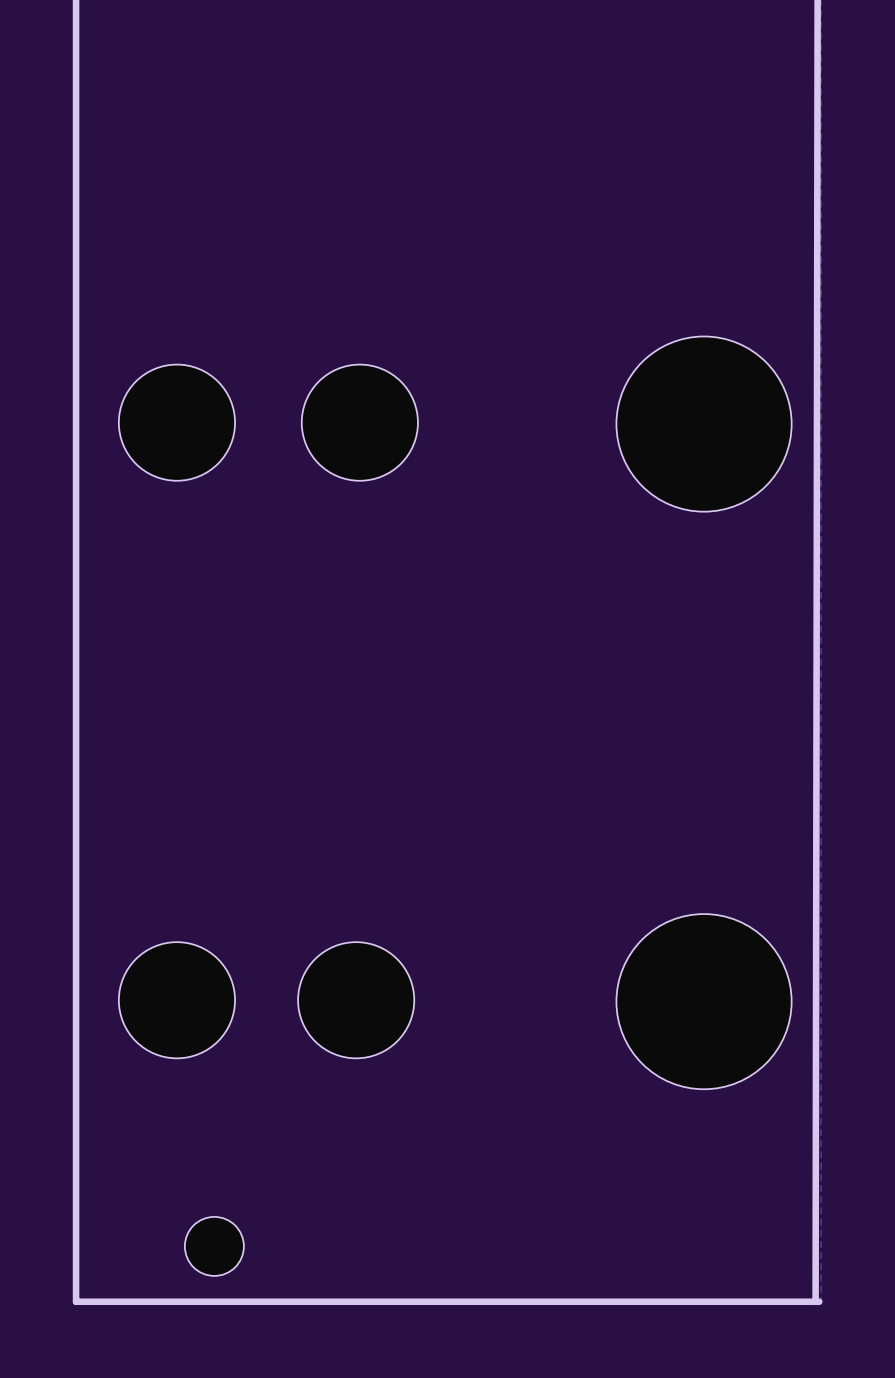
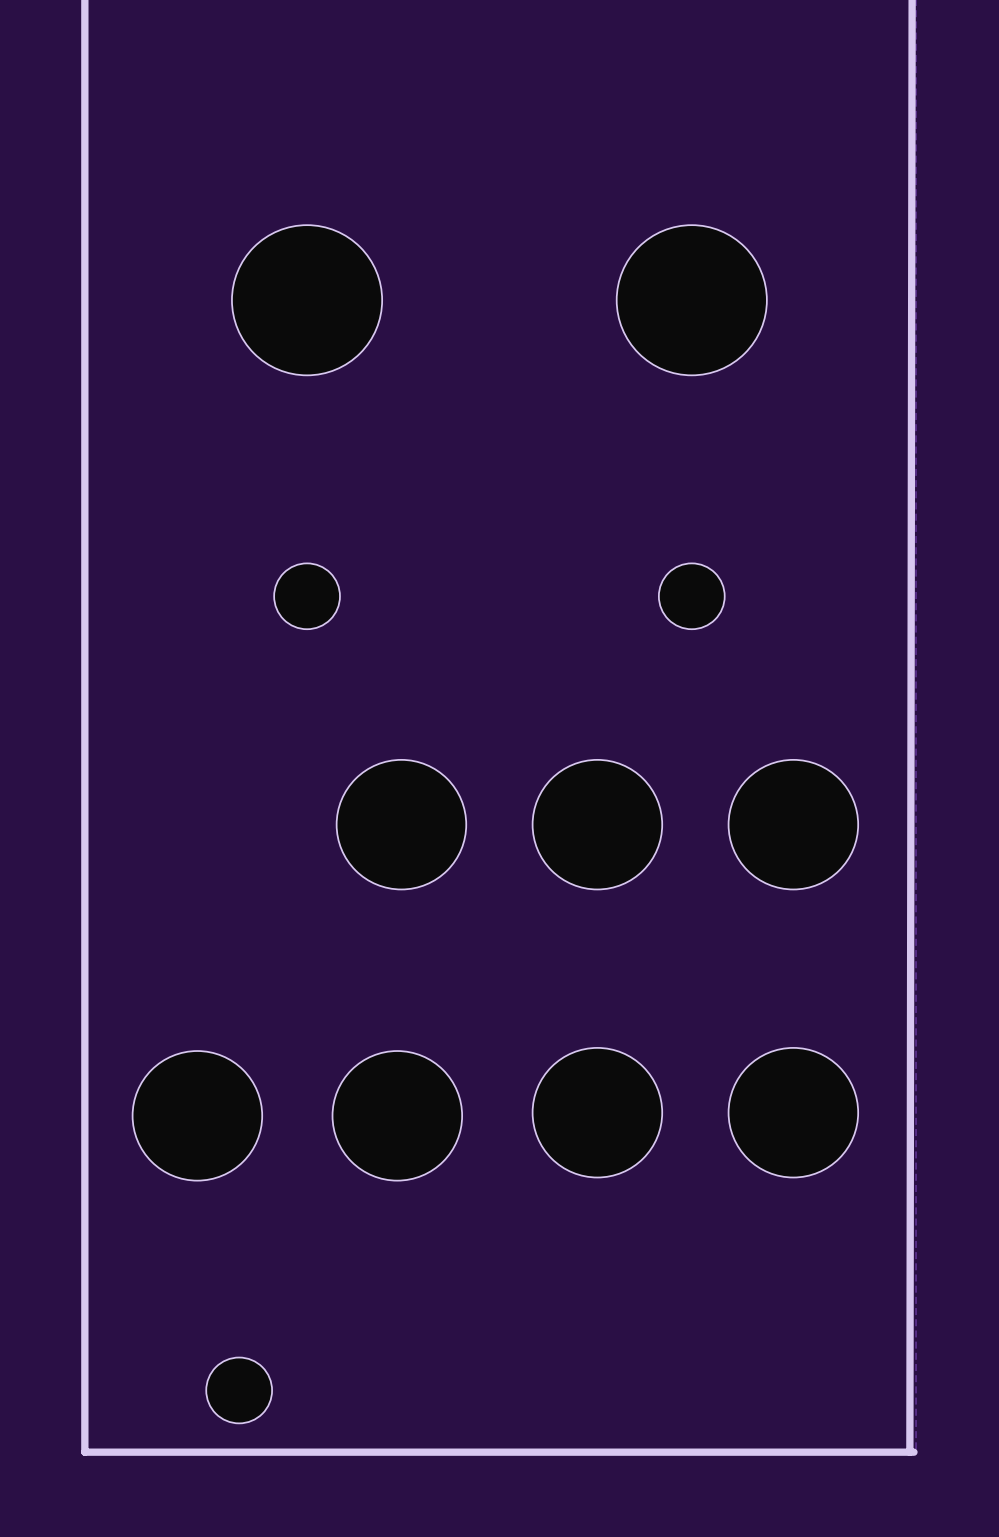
part: none -> (307, 300)
part: none -> (691, 300)
part: (176, 422) -> none
part: (359, 422) -> none
part: (704, 424) -> none
part: none -> (307, 596)
part: none -> (691, 596)
part: none -> (401, 824)
part: none -> (597, 824)
part: none -> (793, 824)
part footprint: [616, 914, 792, 1090] -> [728, 1047, 859, 1178]
part: none -> (597, 1112)

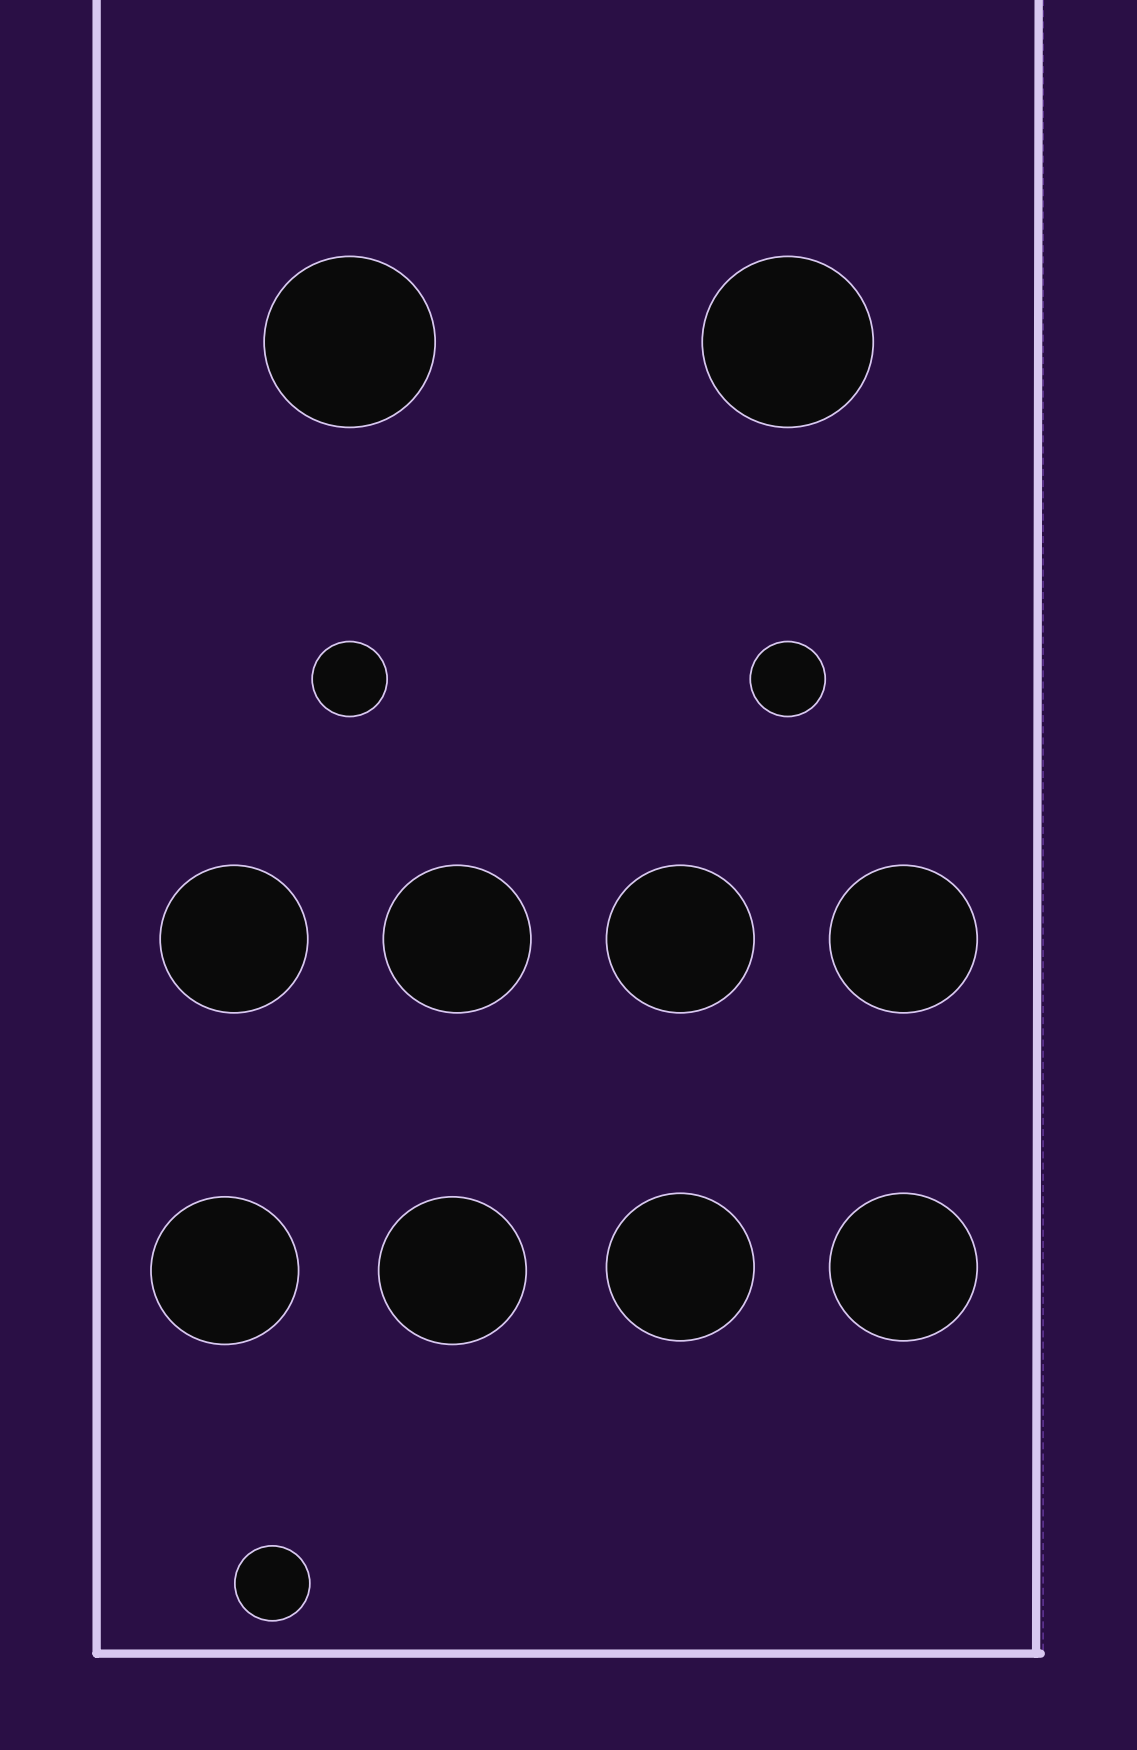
part: none -> (233, 939)

